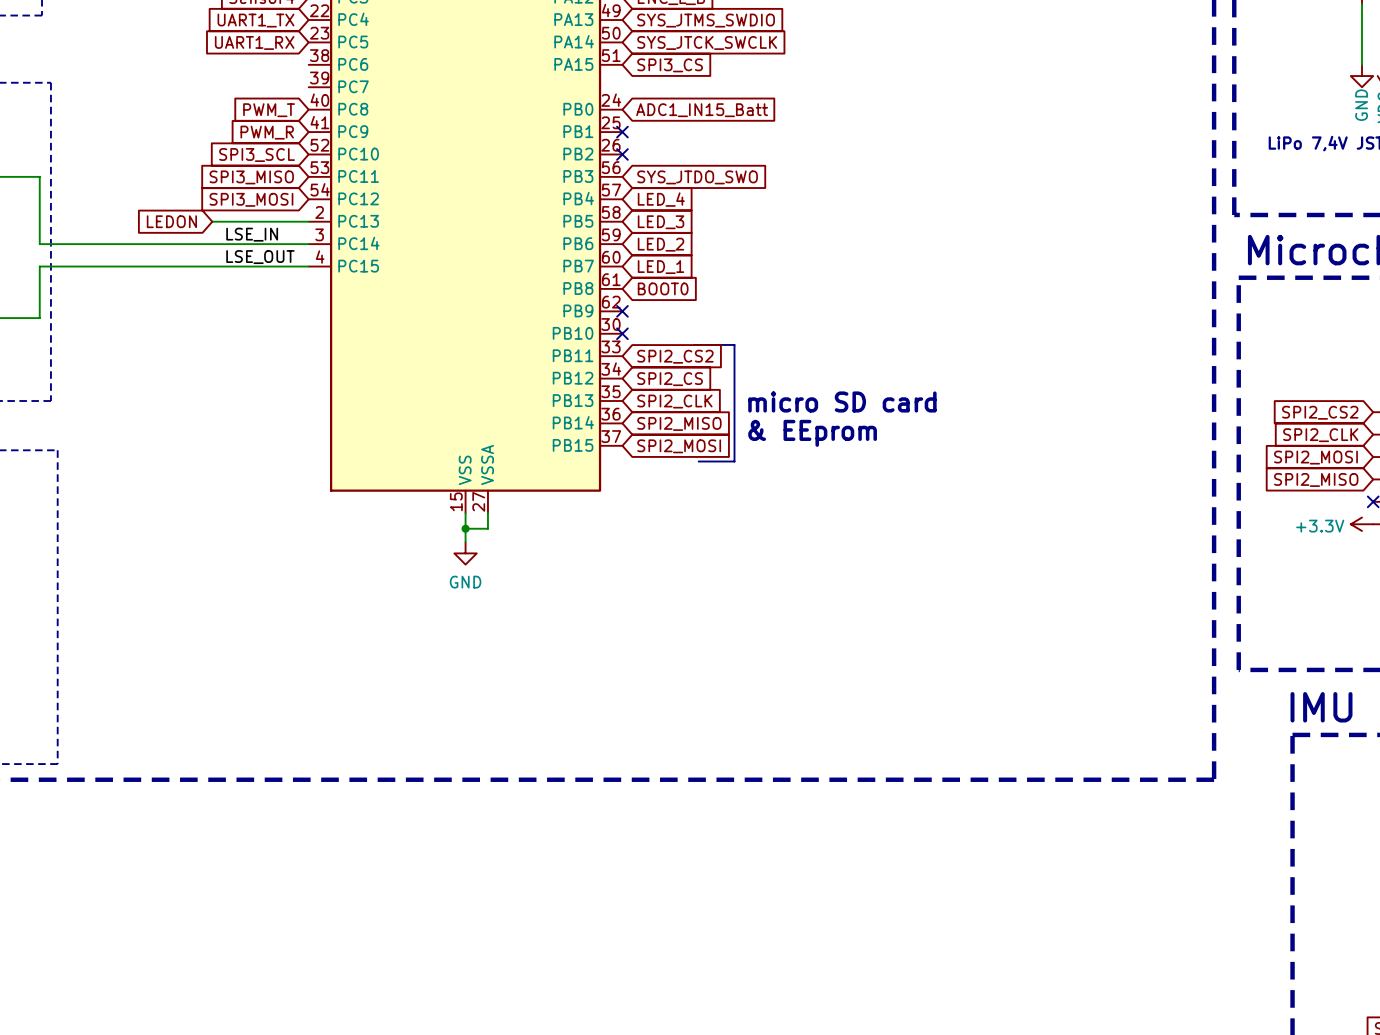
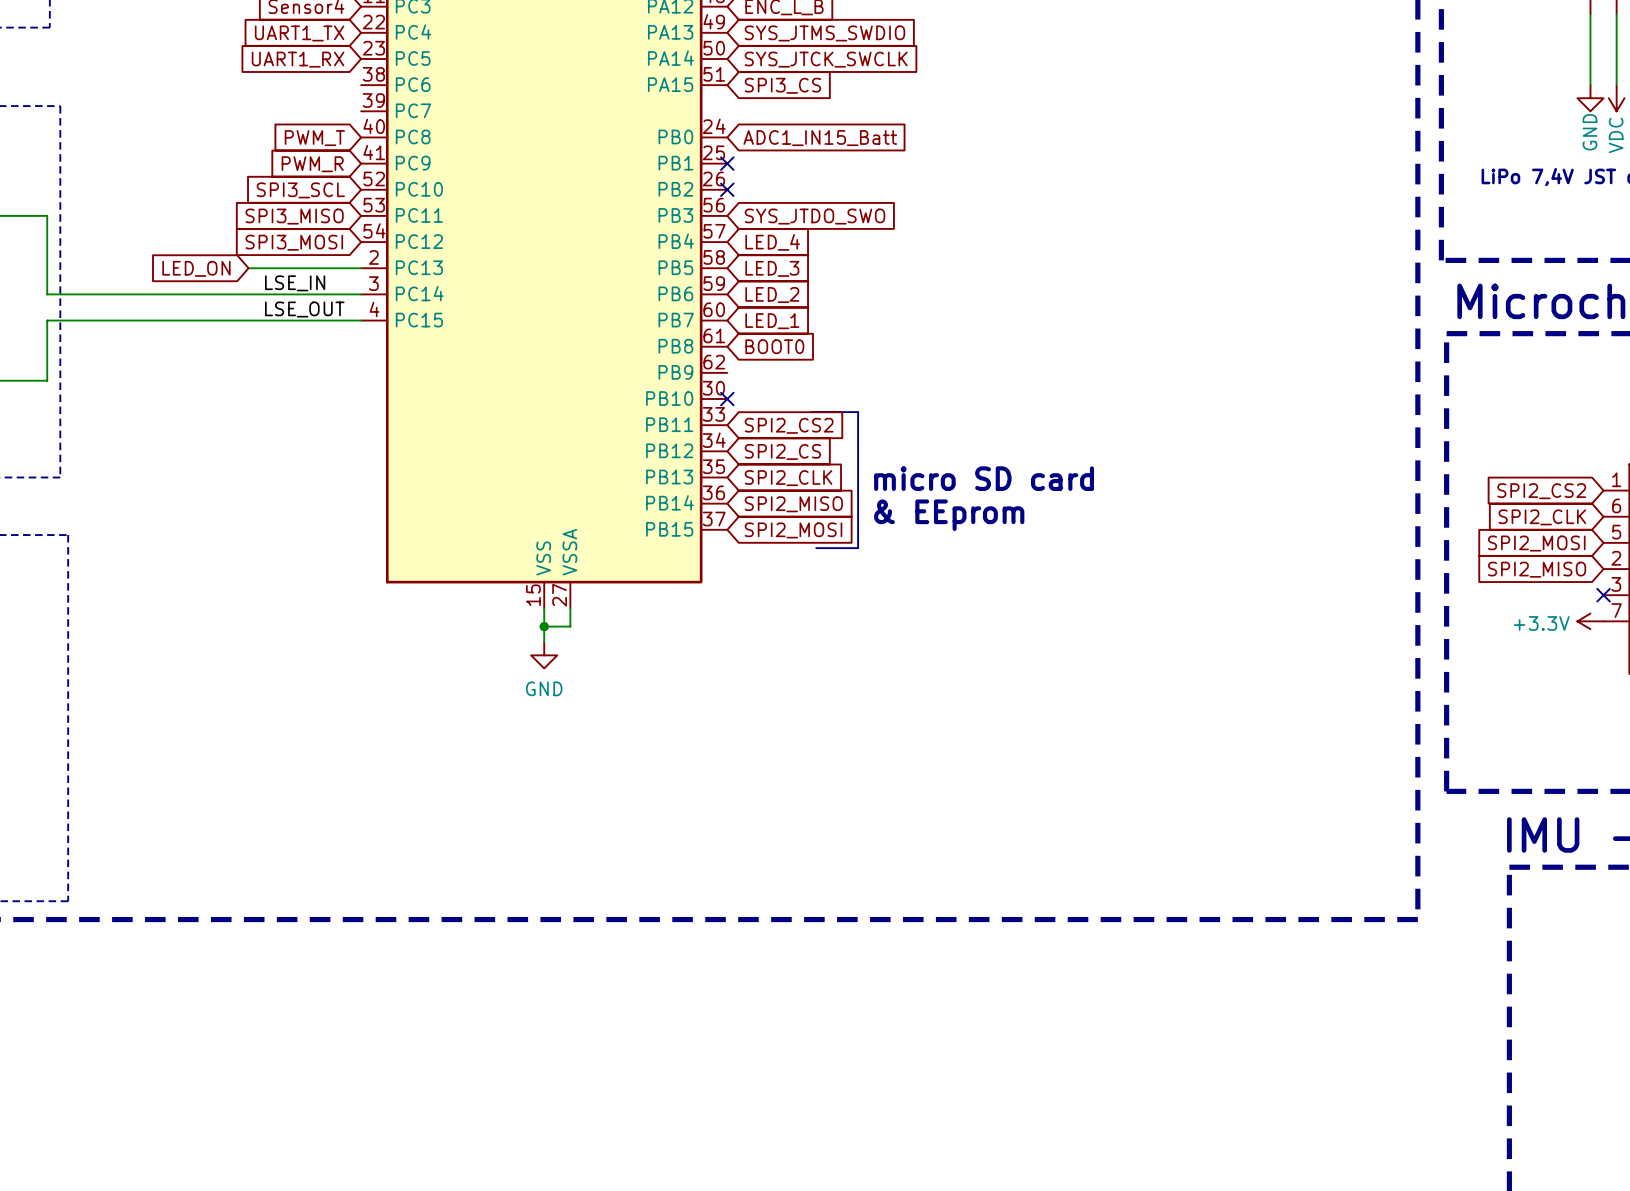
global label: LEDON (171, 221) -> LED_ON (196, 268)
no-connect mark: (622, 311) -> none

